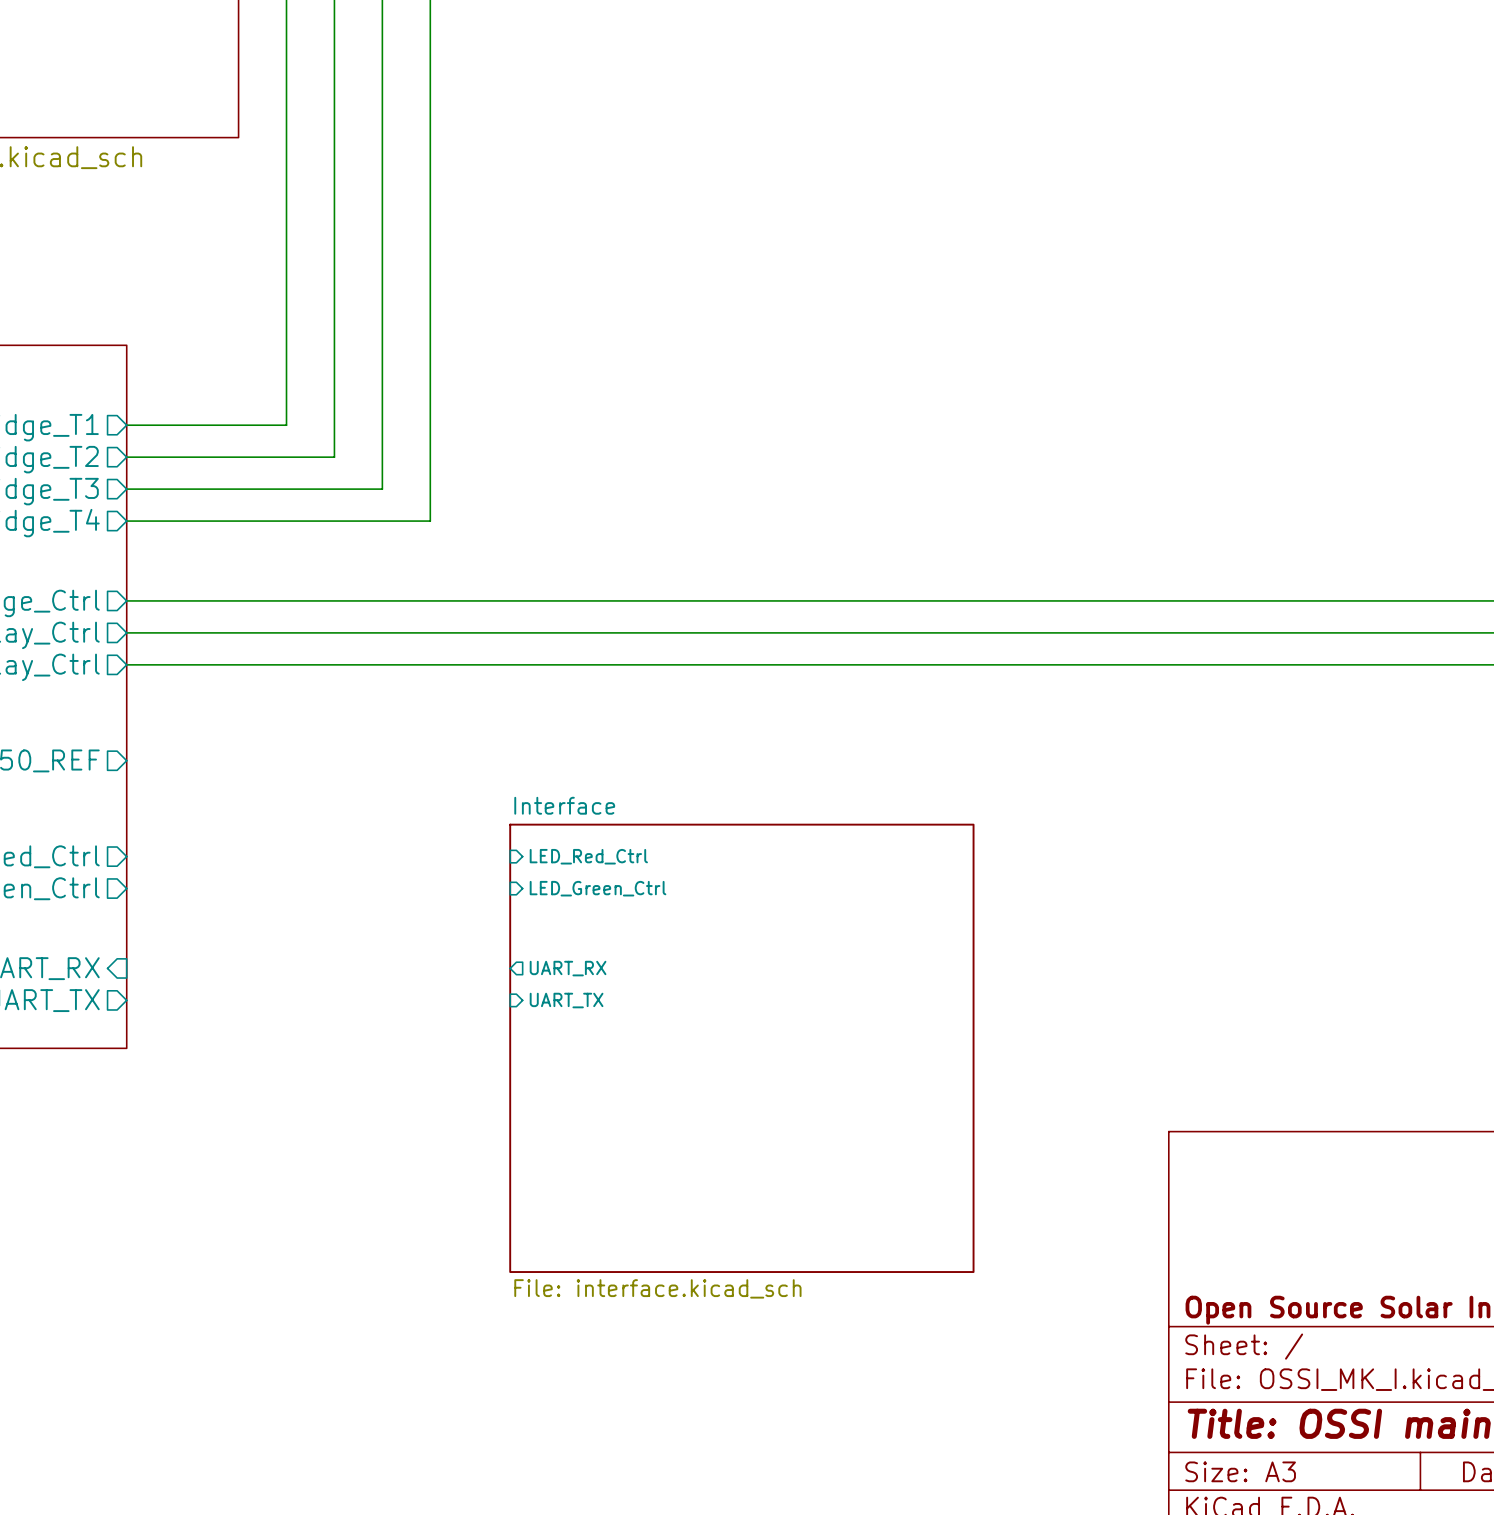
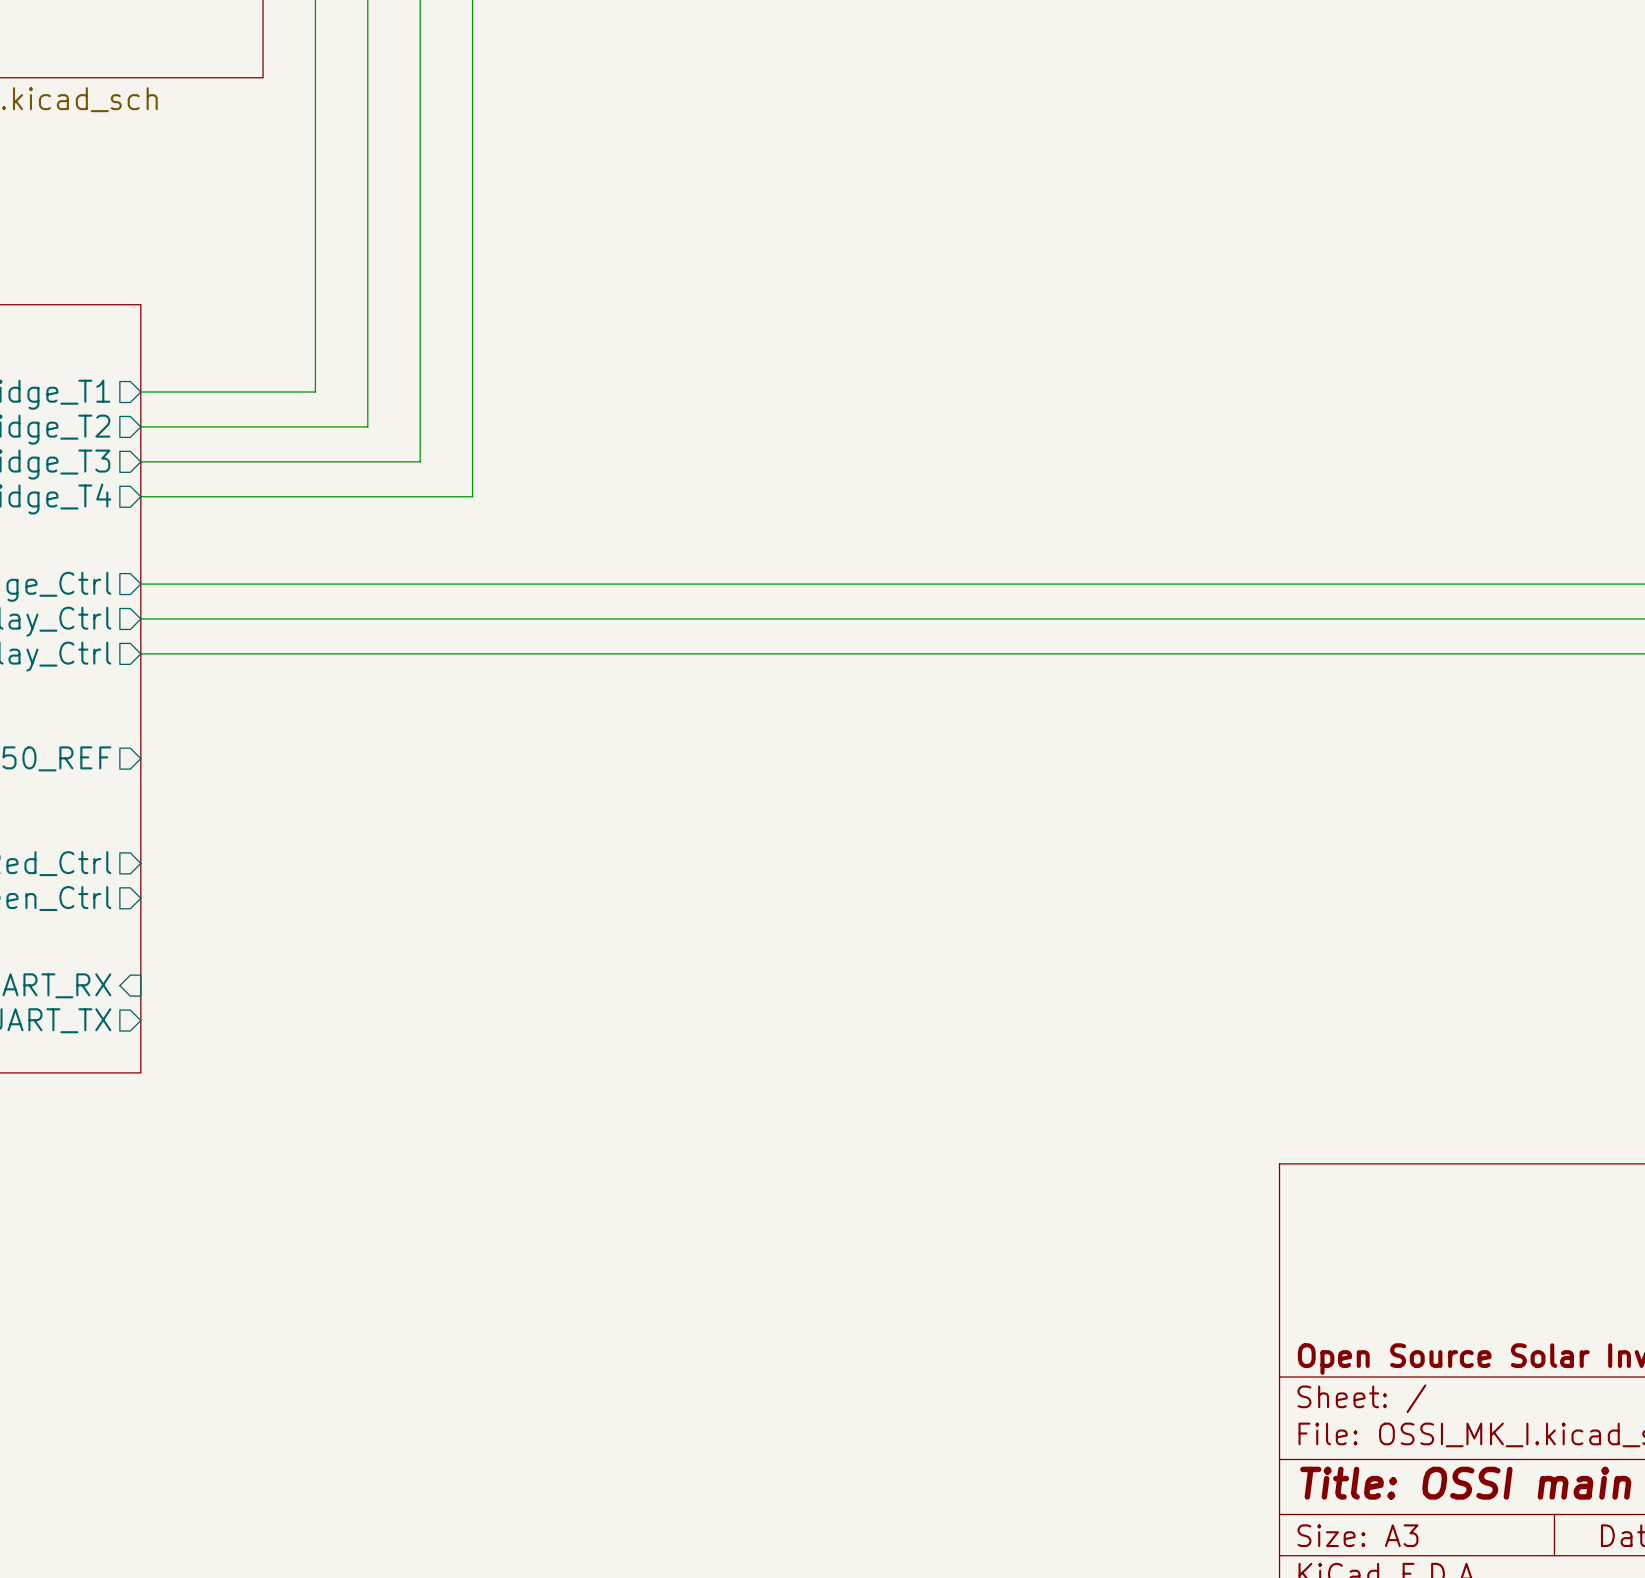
sheet pin: LED_Red_Ctrl (588, 856) -> none
sheet pin: LED_Green_Ctrl (598, 888) -> none
sheet pin: UART_RX (568, 968) -> none
sheet pin: UART_TX (566, 1000) -> none
sheet Interface: File: interface.kicad_sch (741, 1048) -> none

